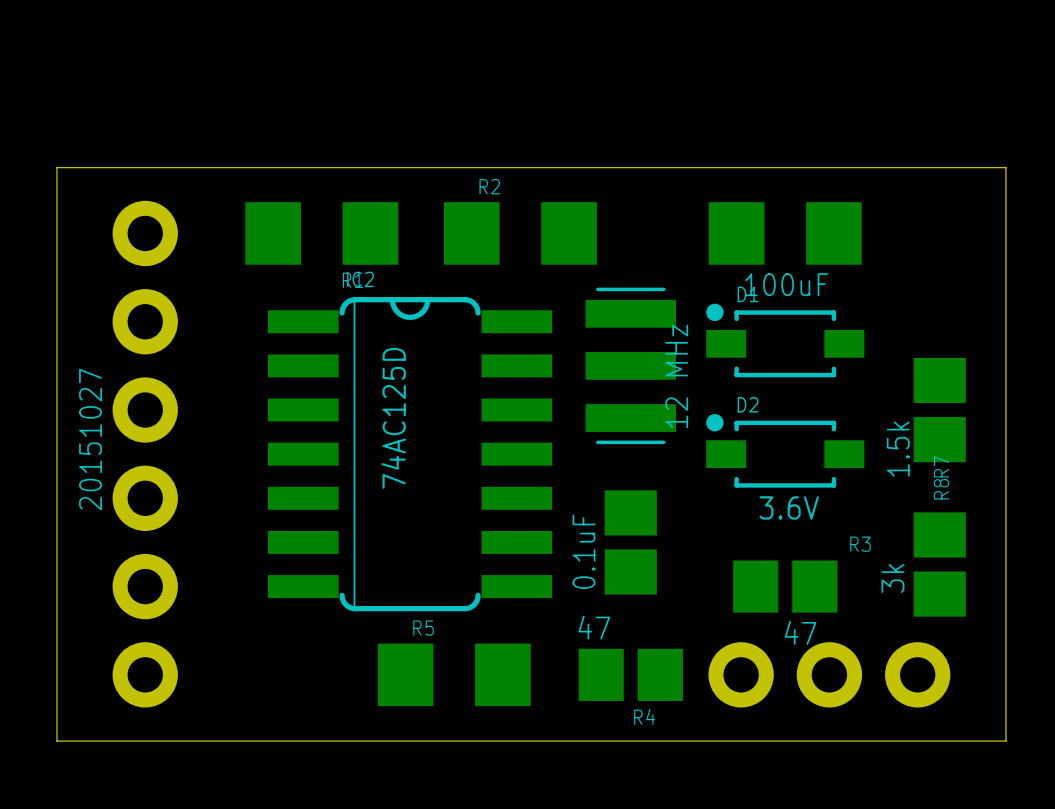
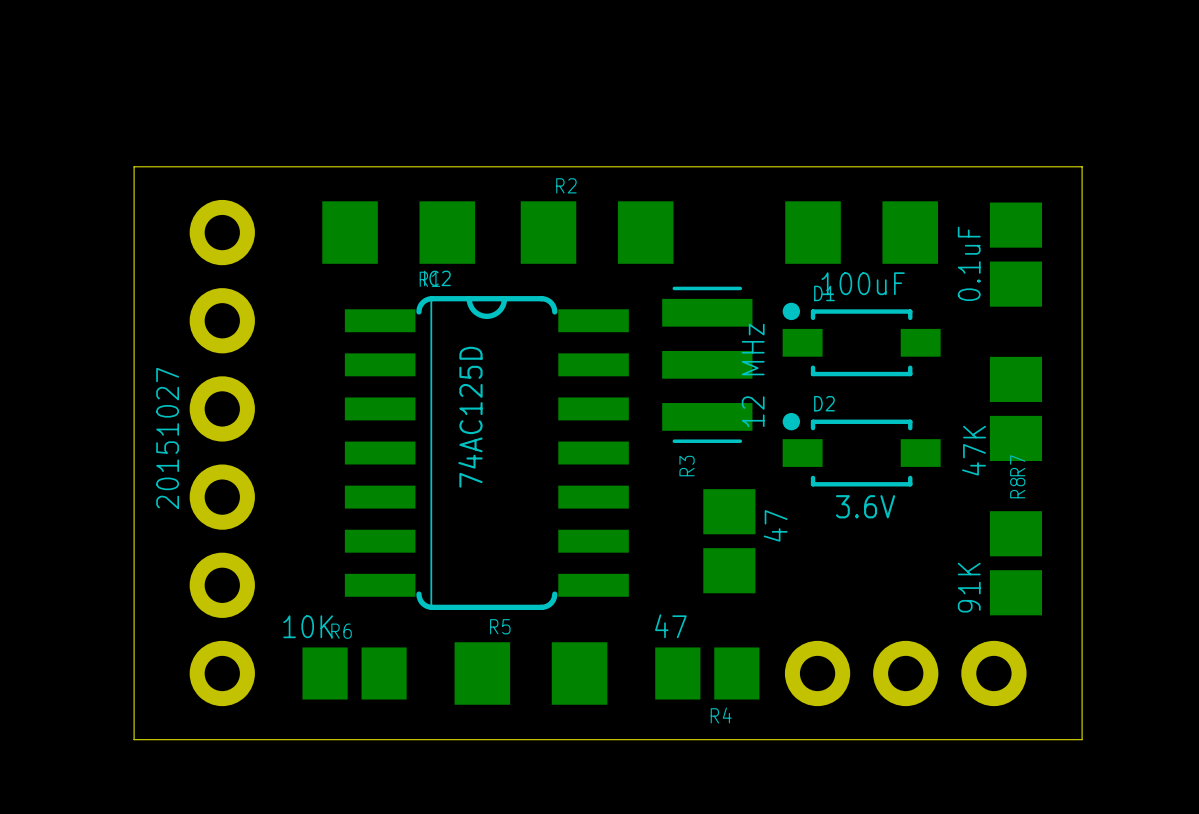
R7 value: 1.5k (898, 449) -> 47K (974, 450)
part position: (630, 542) -> (1015, 254)
R3 name position: R3 (860, 544) -> R3 (687, 466)
R8 value: 3k (892, 578) -> 91K (969, 587)
R3 rotation: 0° (785, 586) -> 90° clockwise (729, 541)
R3 position: (785, 586) -> (729, 541)
R3 value position: 47 (800, 632) -> 47 (775, 525)
R6: none -> 10K (354, 673)

